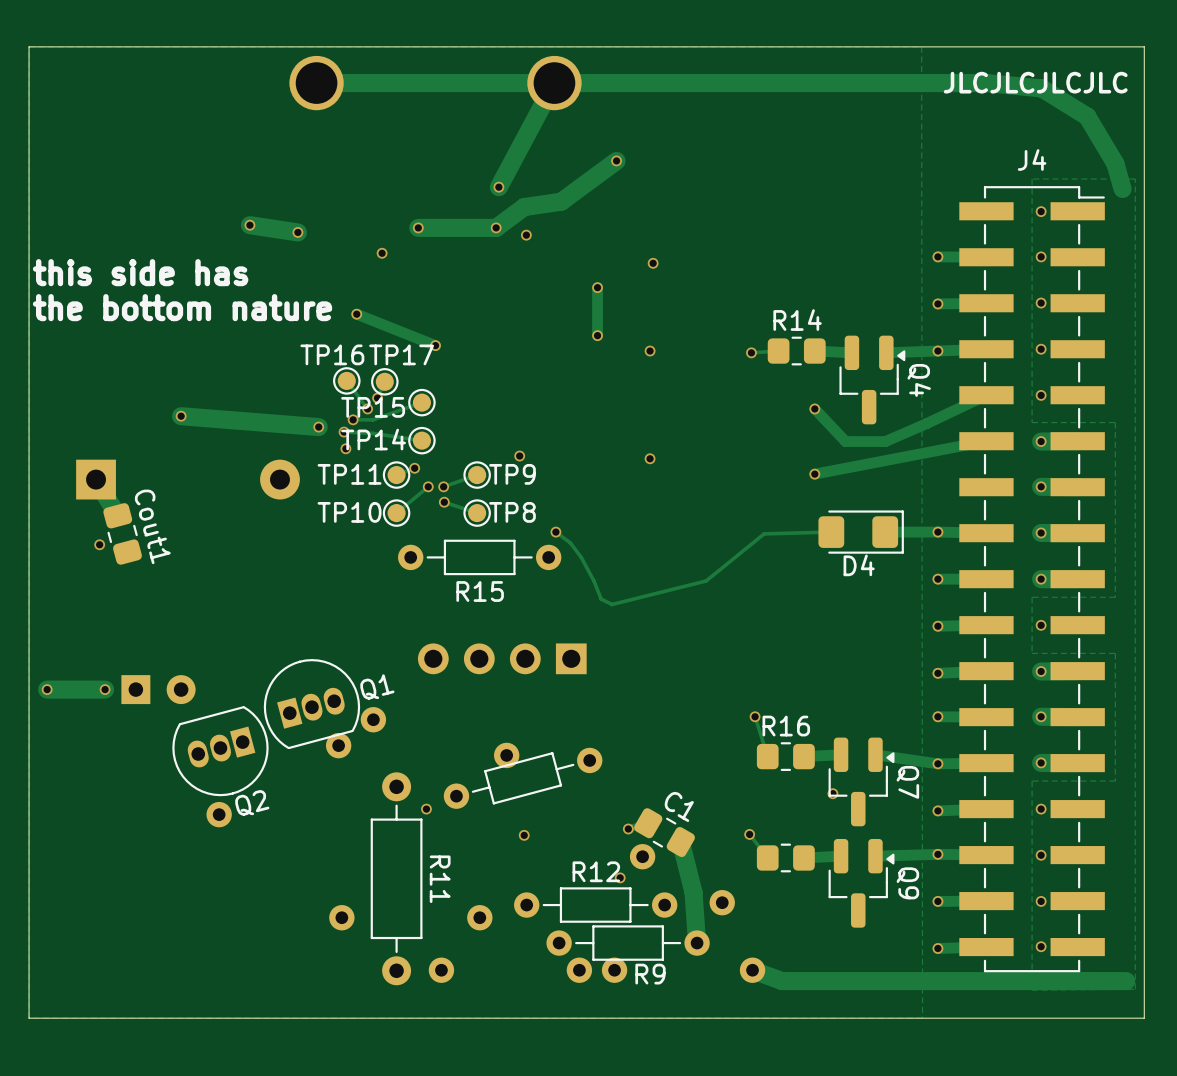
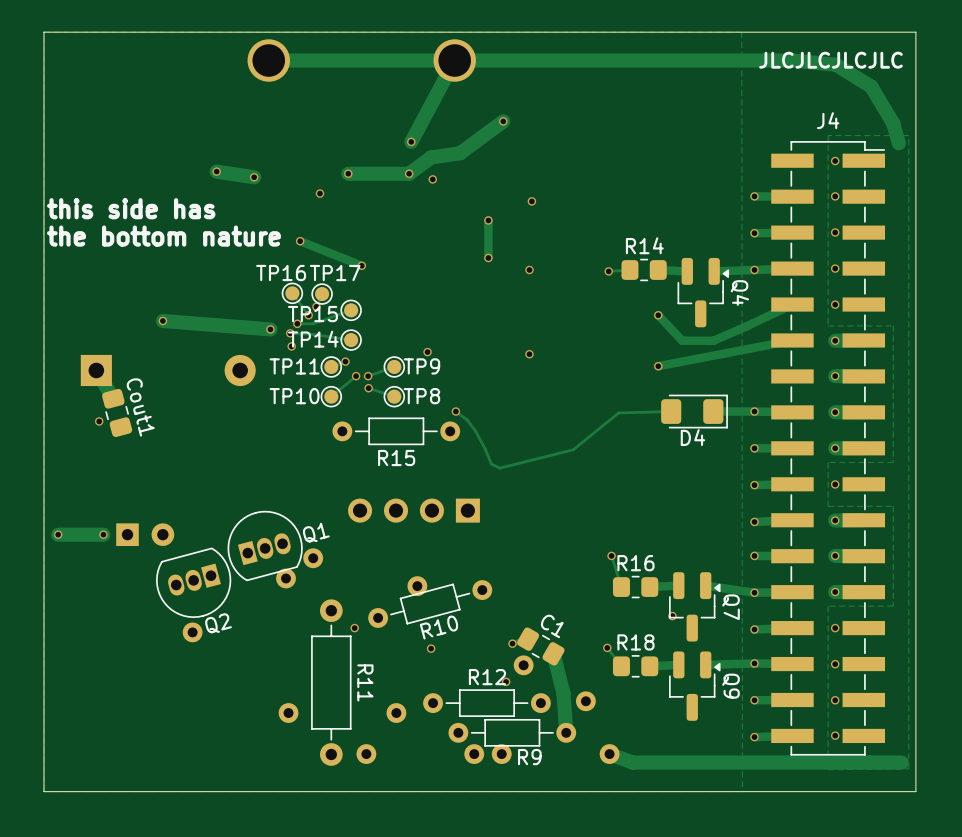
R10 name: none -> R10 (438, 627)
R18 name: none -> R18 (635, 642)

